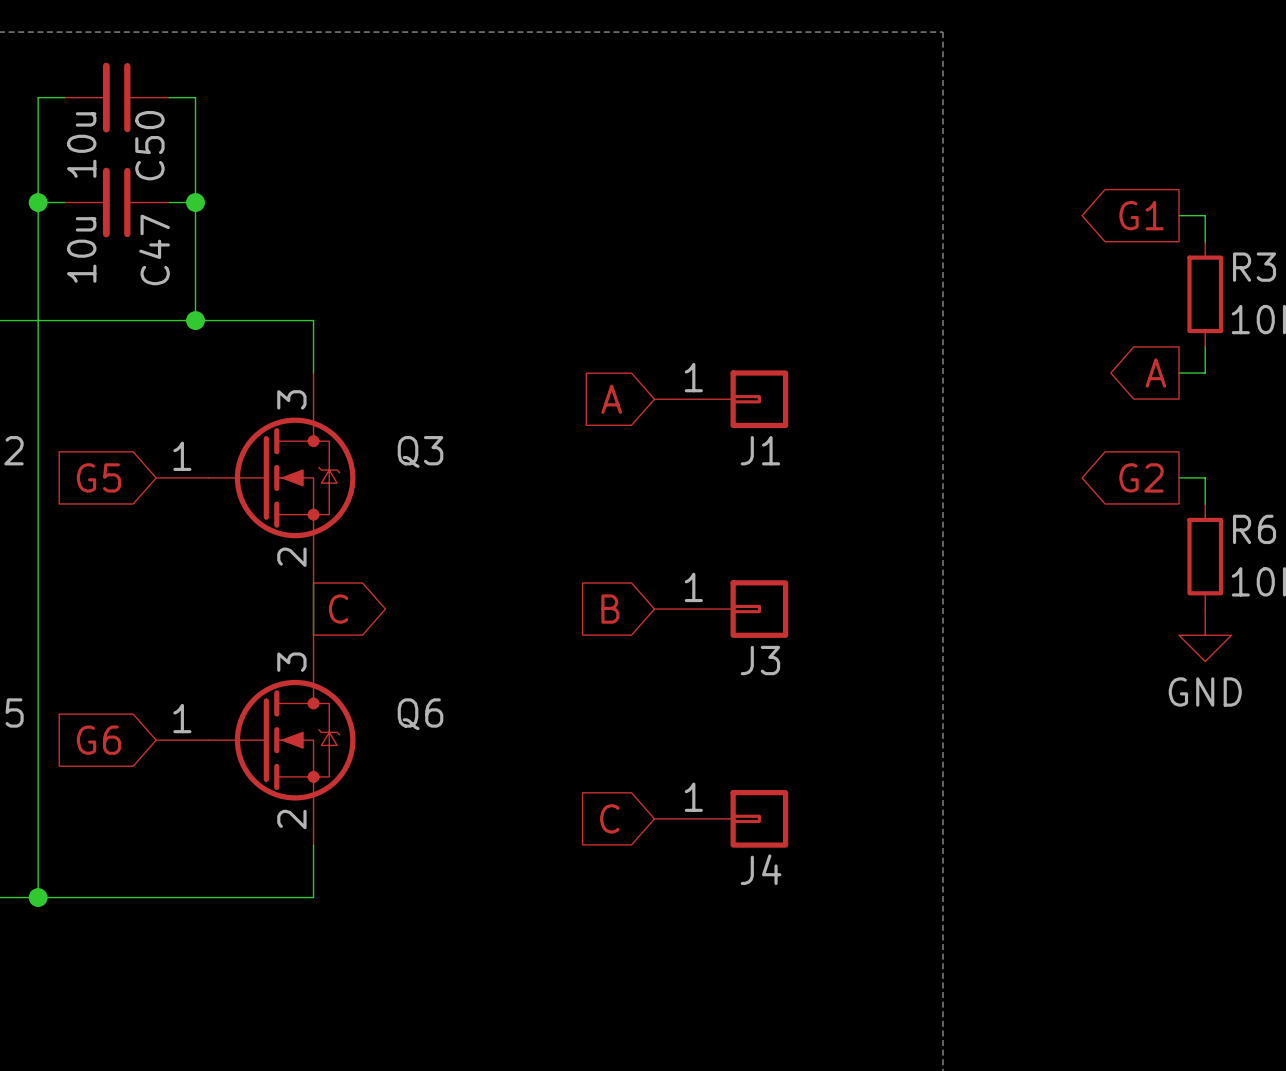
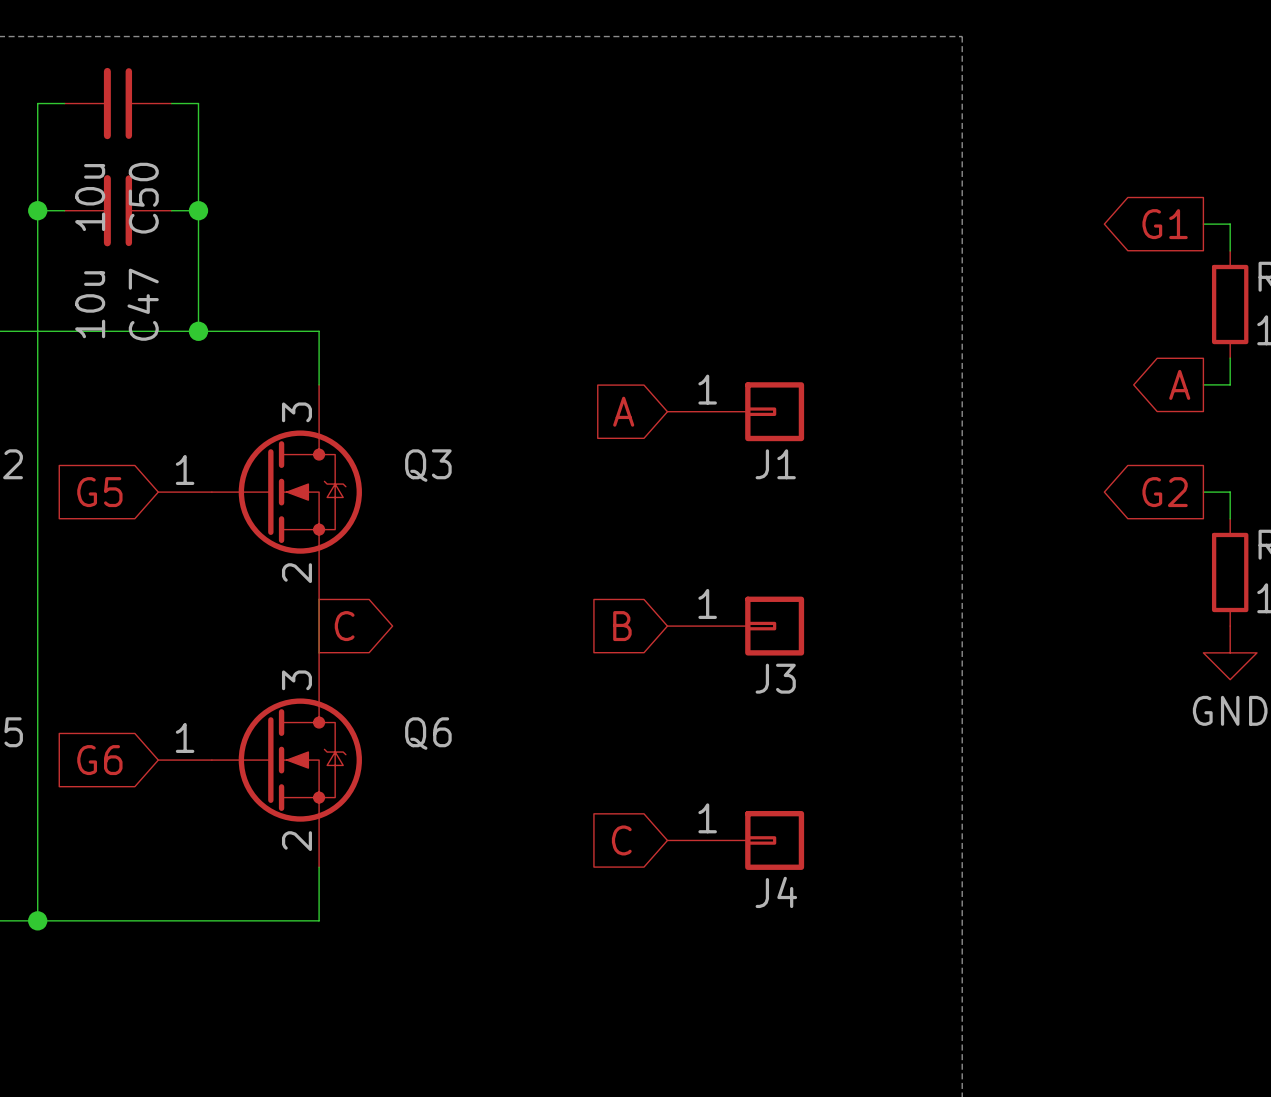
C50 value position: 10u (81, 145) -> 10u (90, 197)
C50 name position: C50 (149, 145) -> C50 (143, 198)
C47 value position: 10u (81, 249) -> 10u (90, 304)
C47 name position: C47 (154, 249) -> C47 (143, 304)

